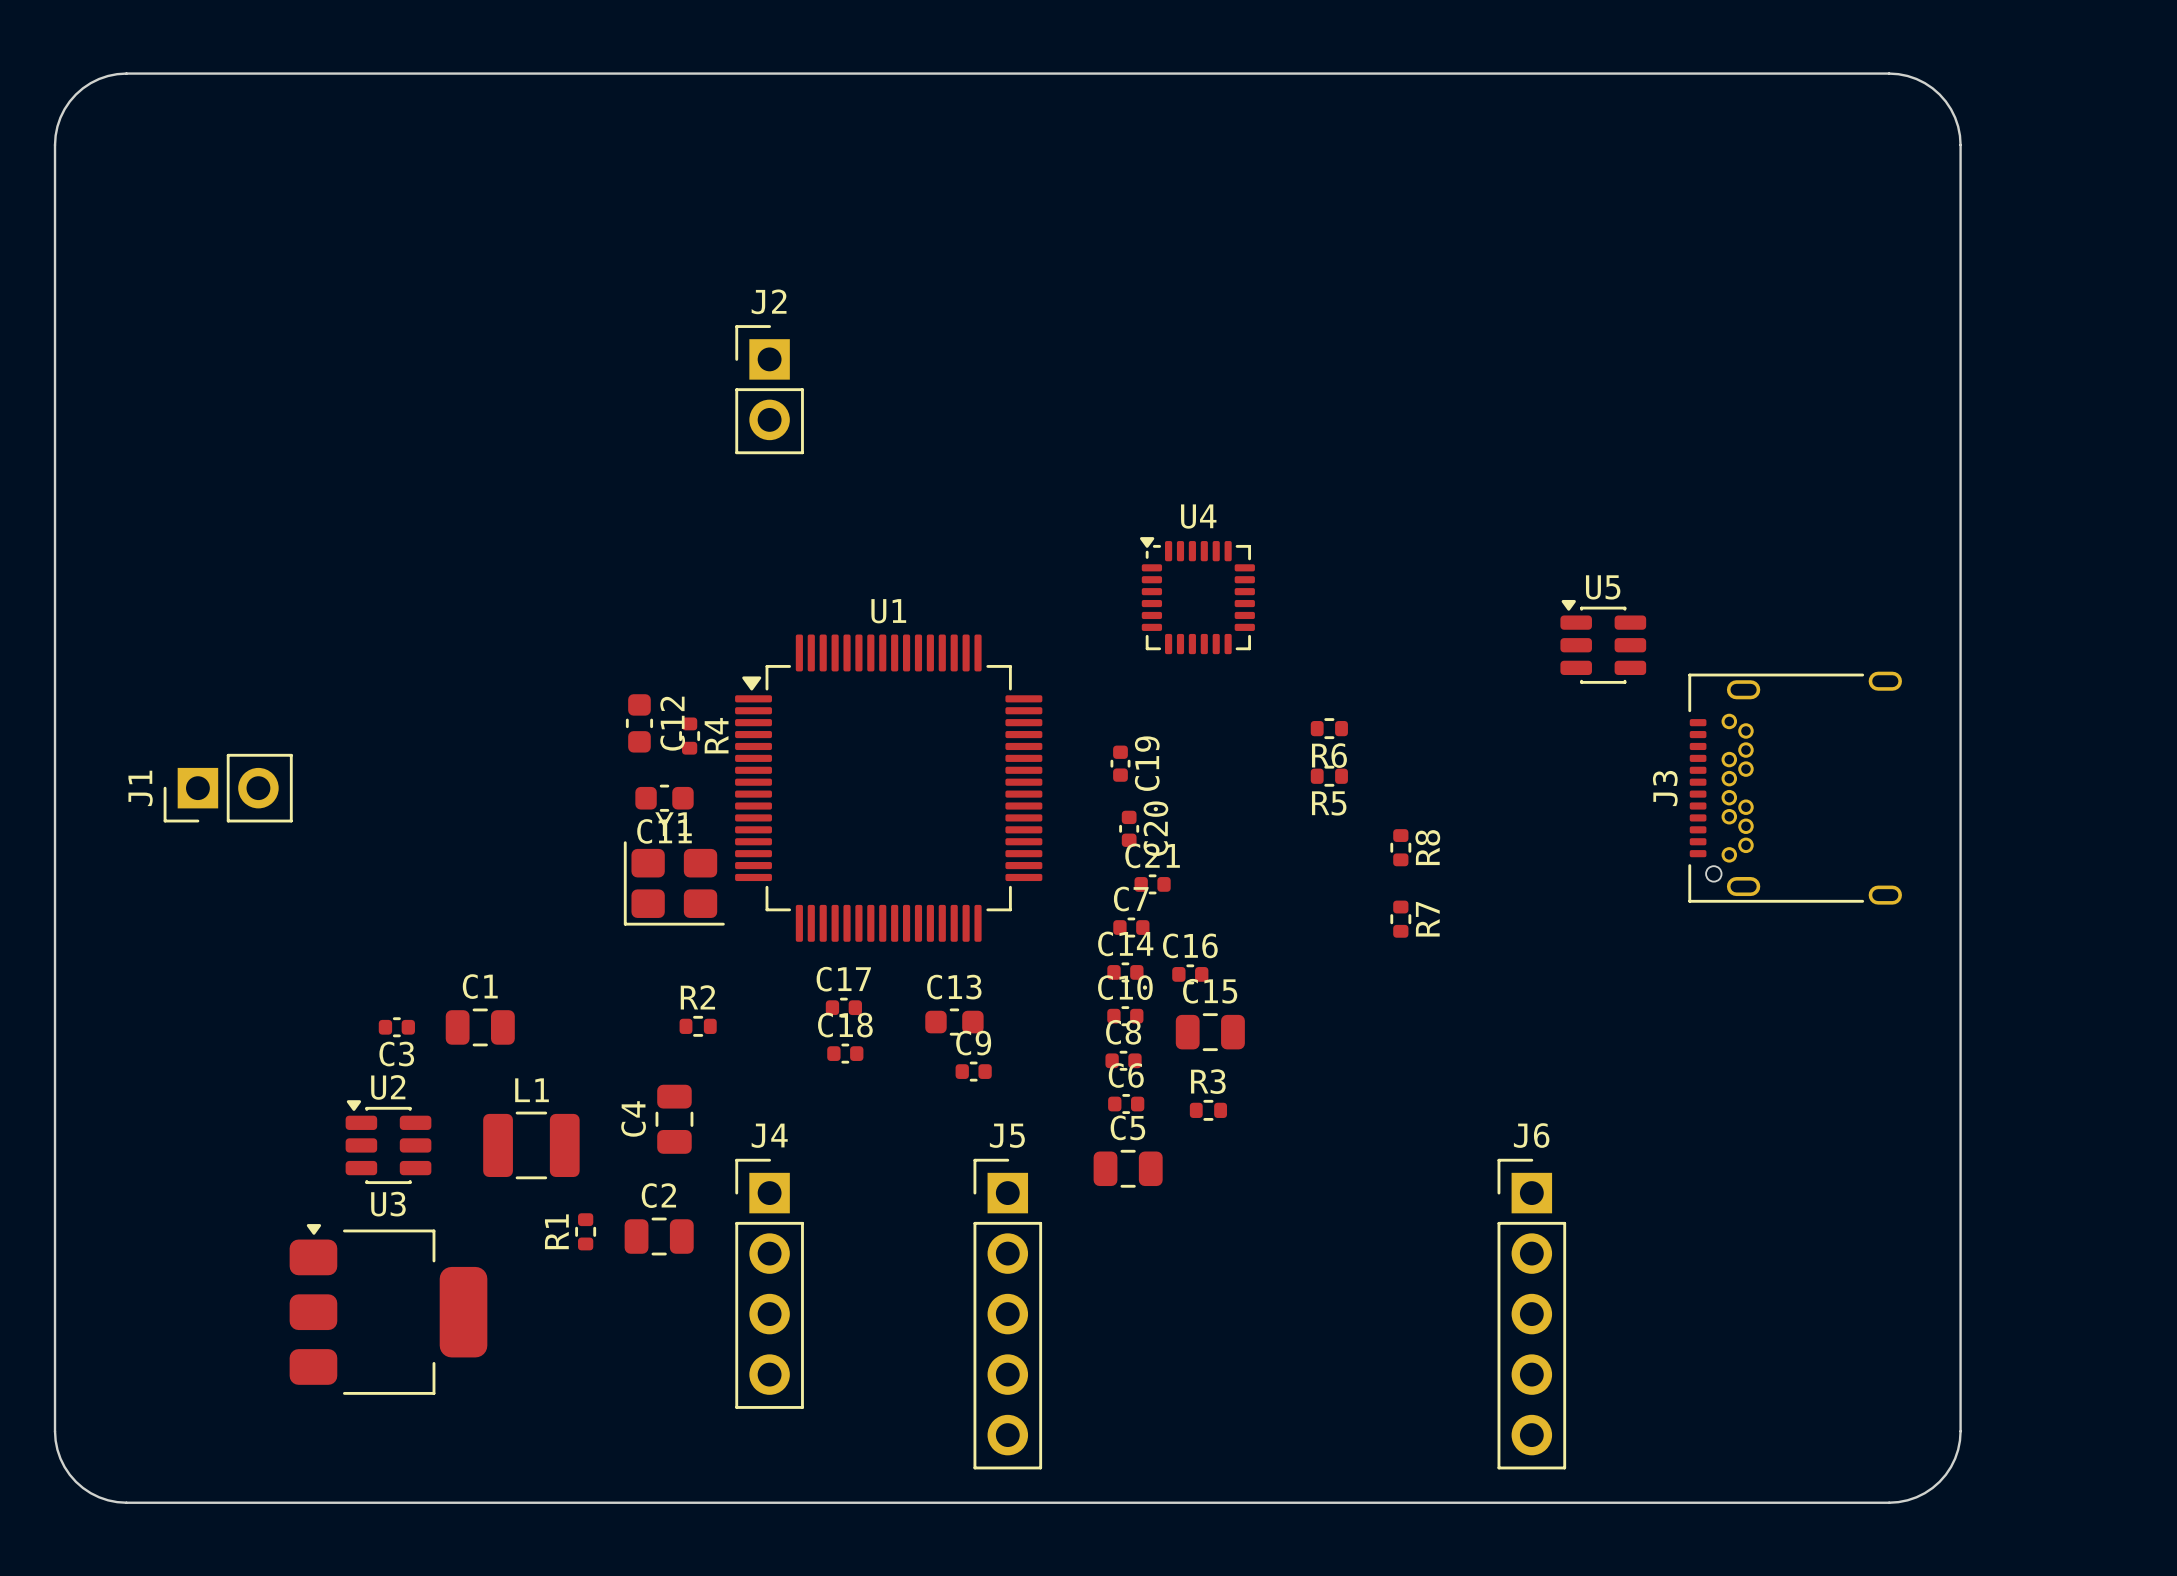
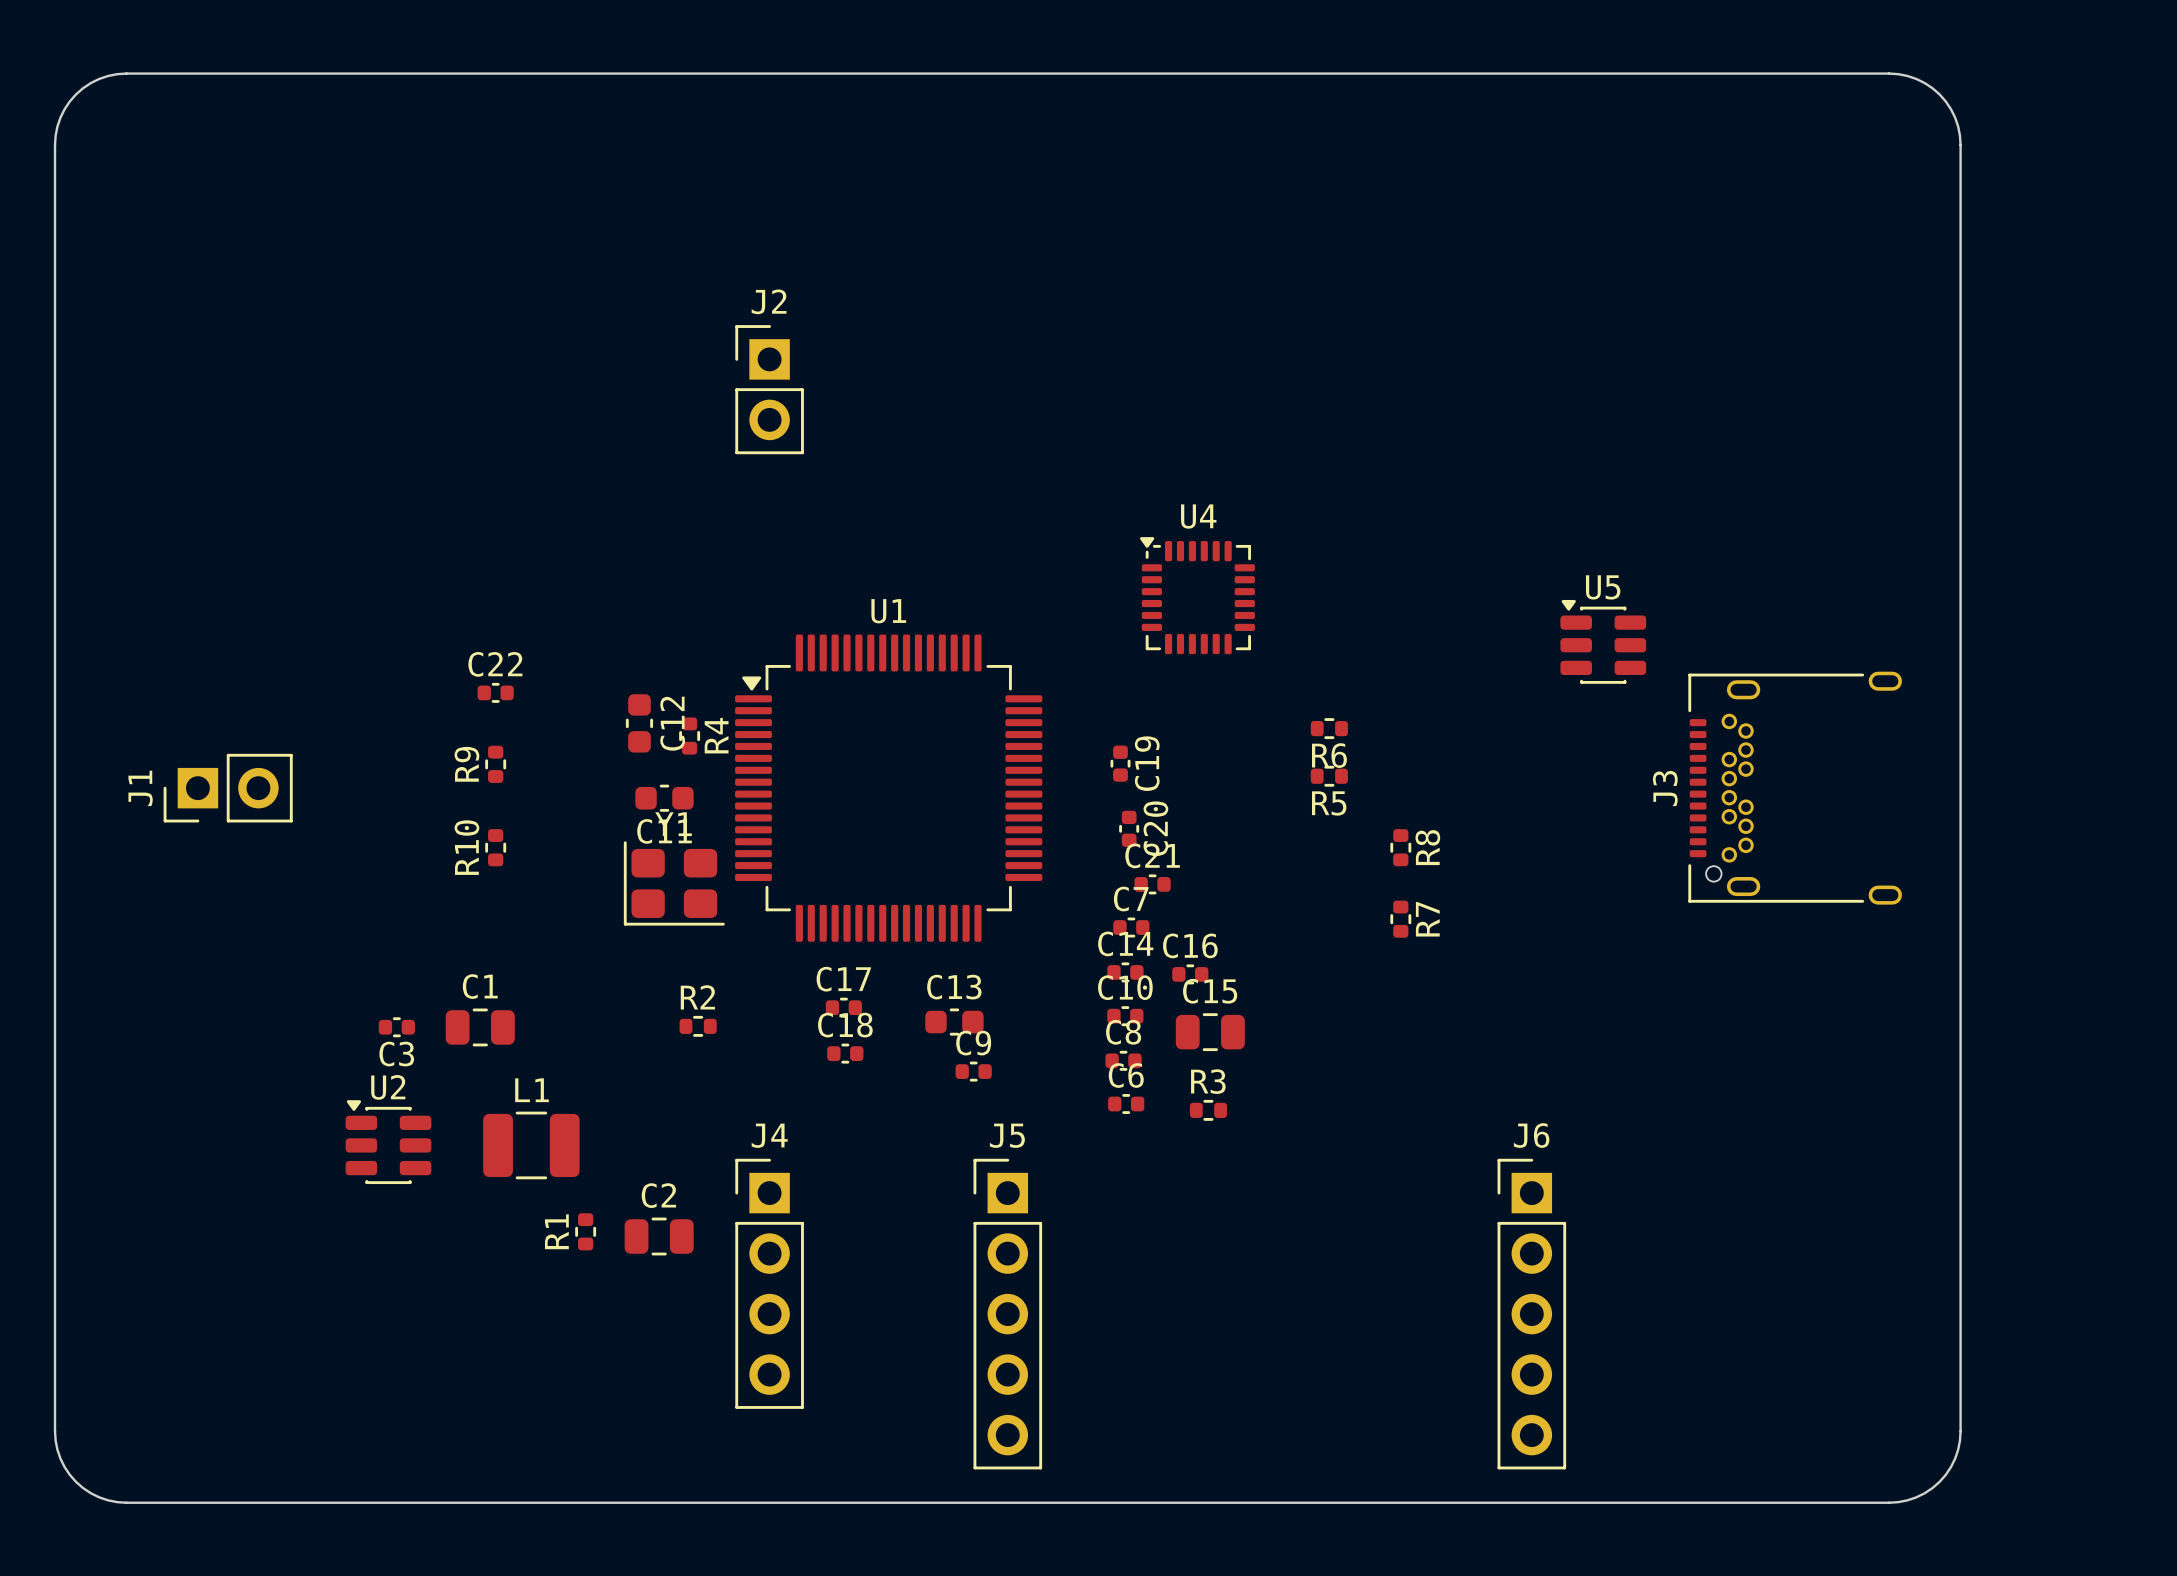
C22: none -> (495, 692)
R9: none -> (495, 764)
R10: none -> (495, 847)
C4: (674, 1119) -> none
C5: (1128, 1168) -> none
U3: (388, 1309) -> none

